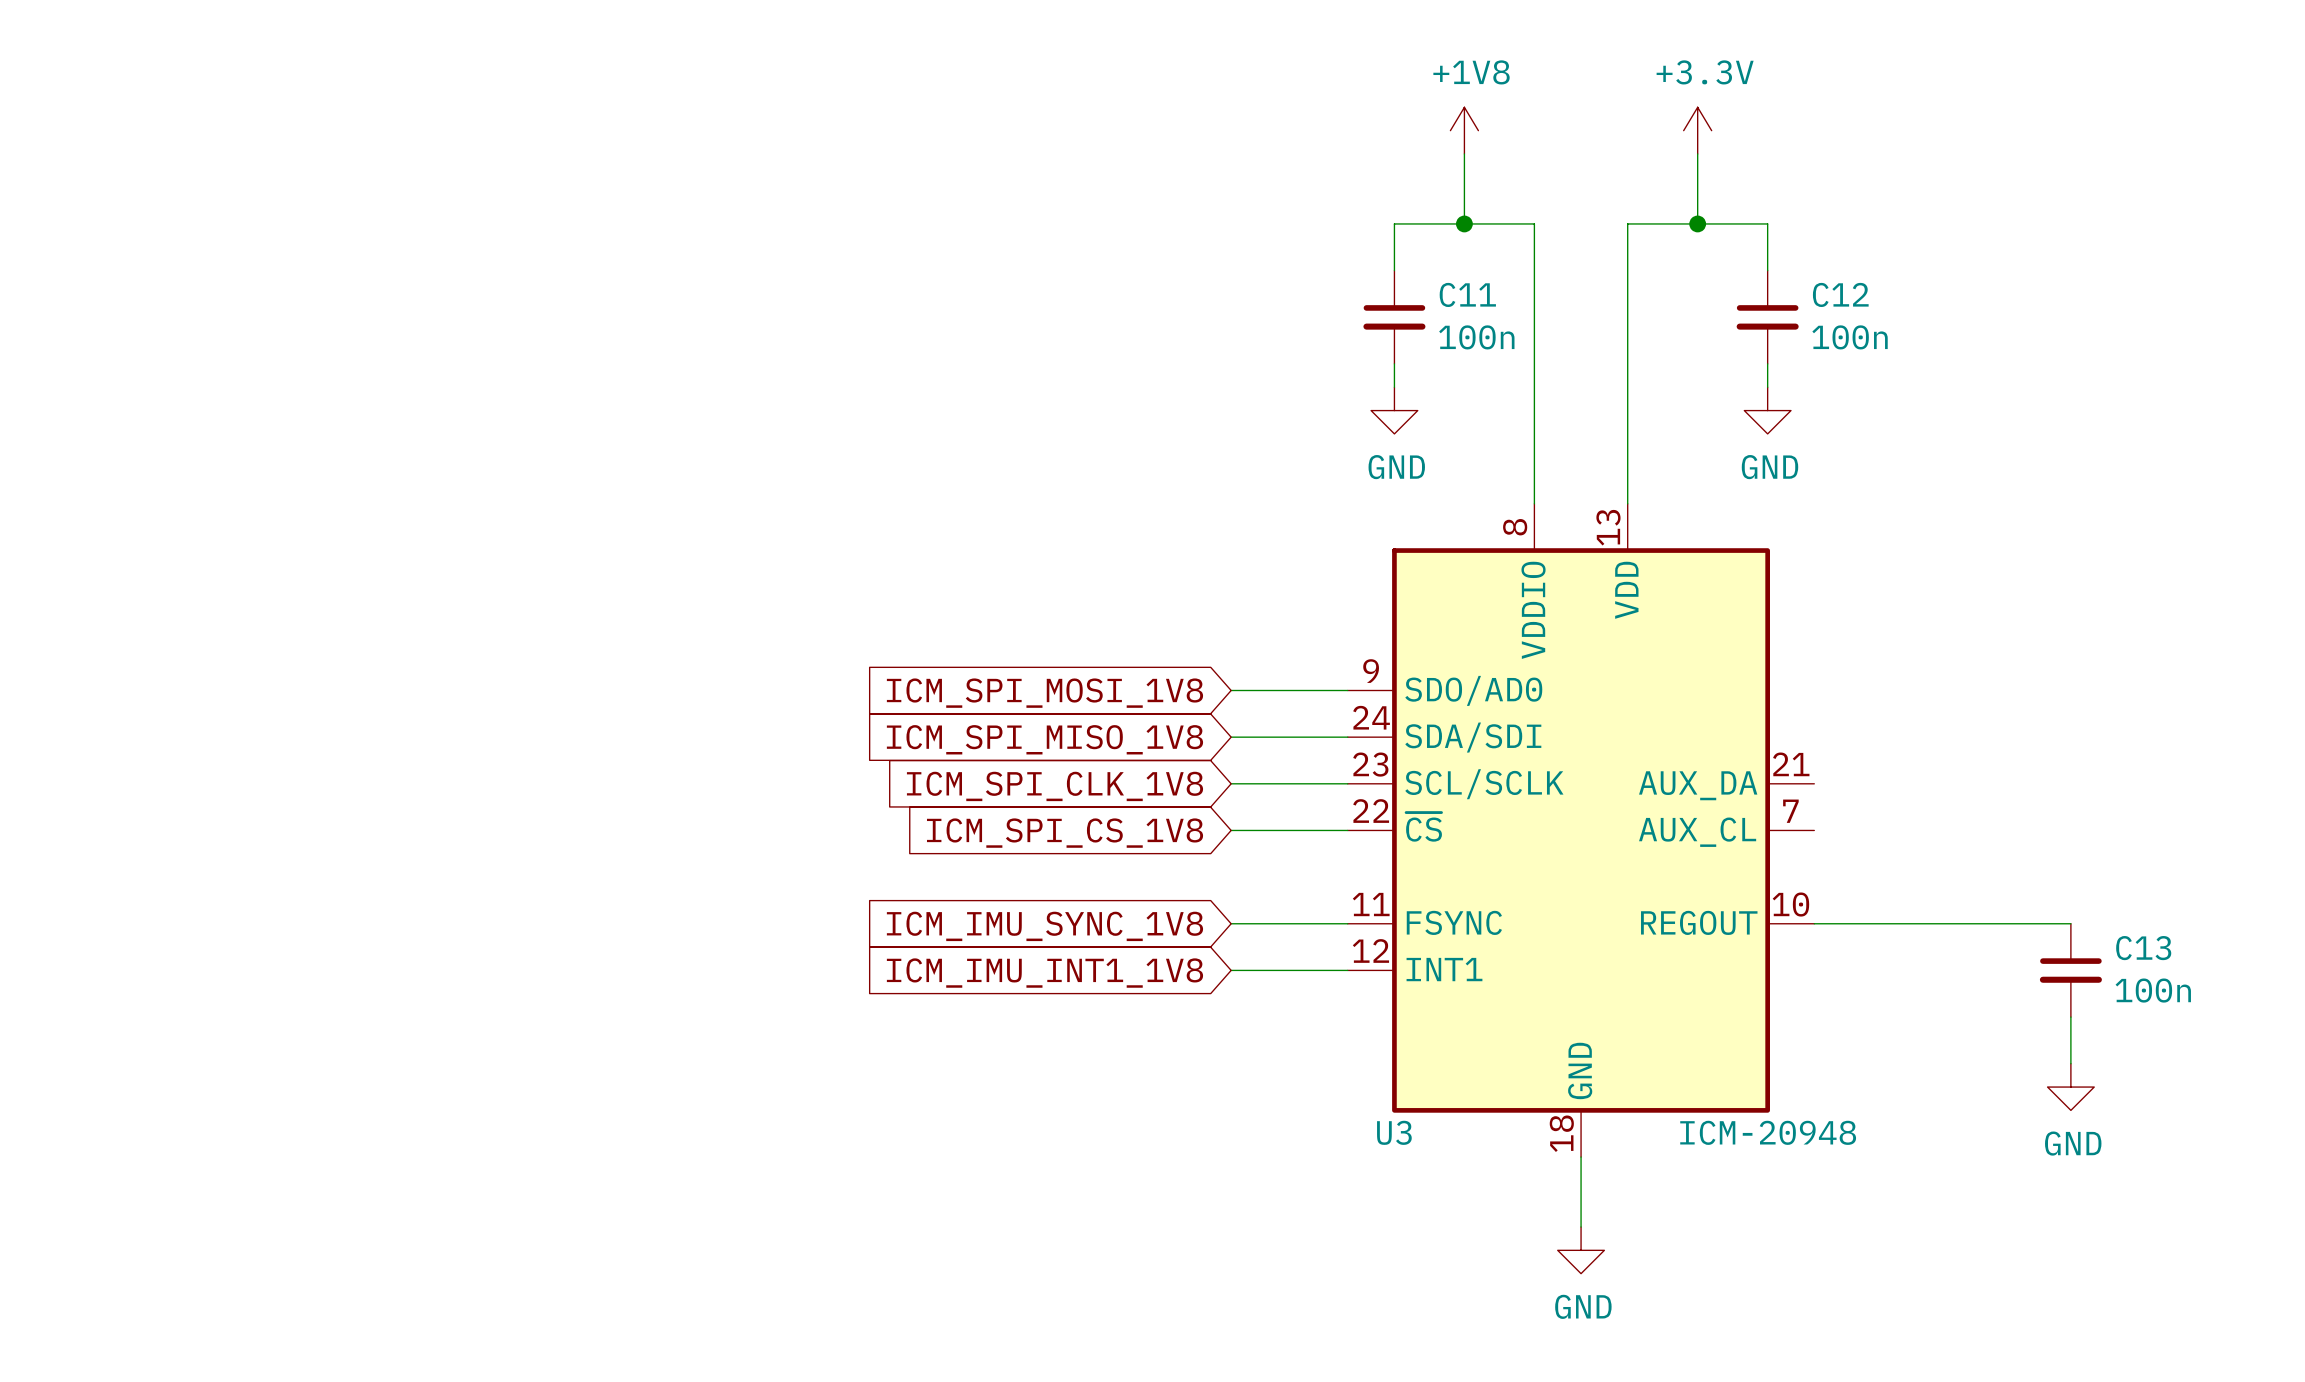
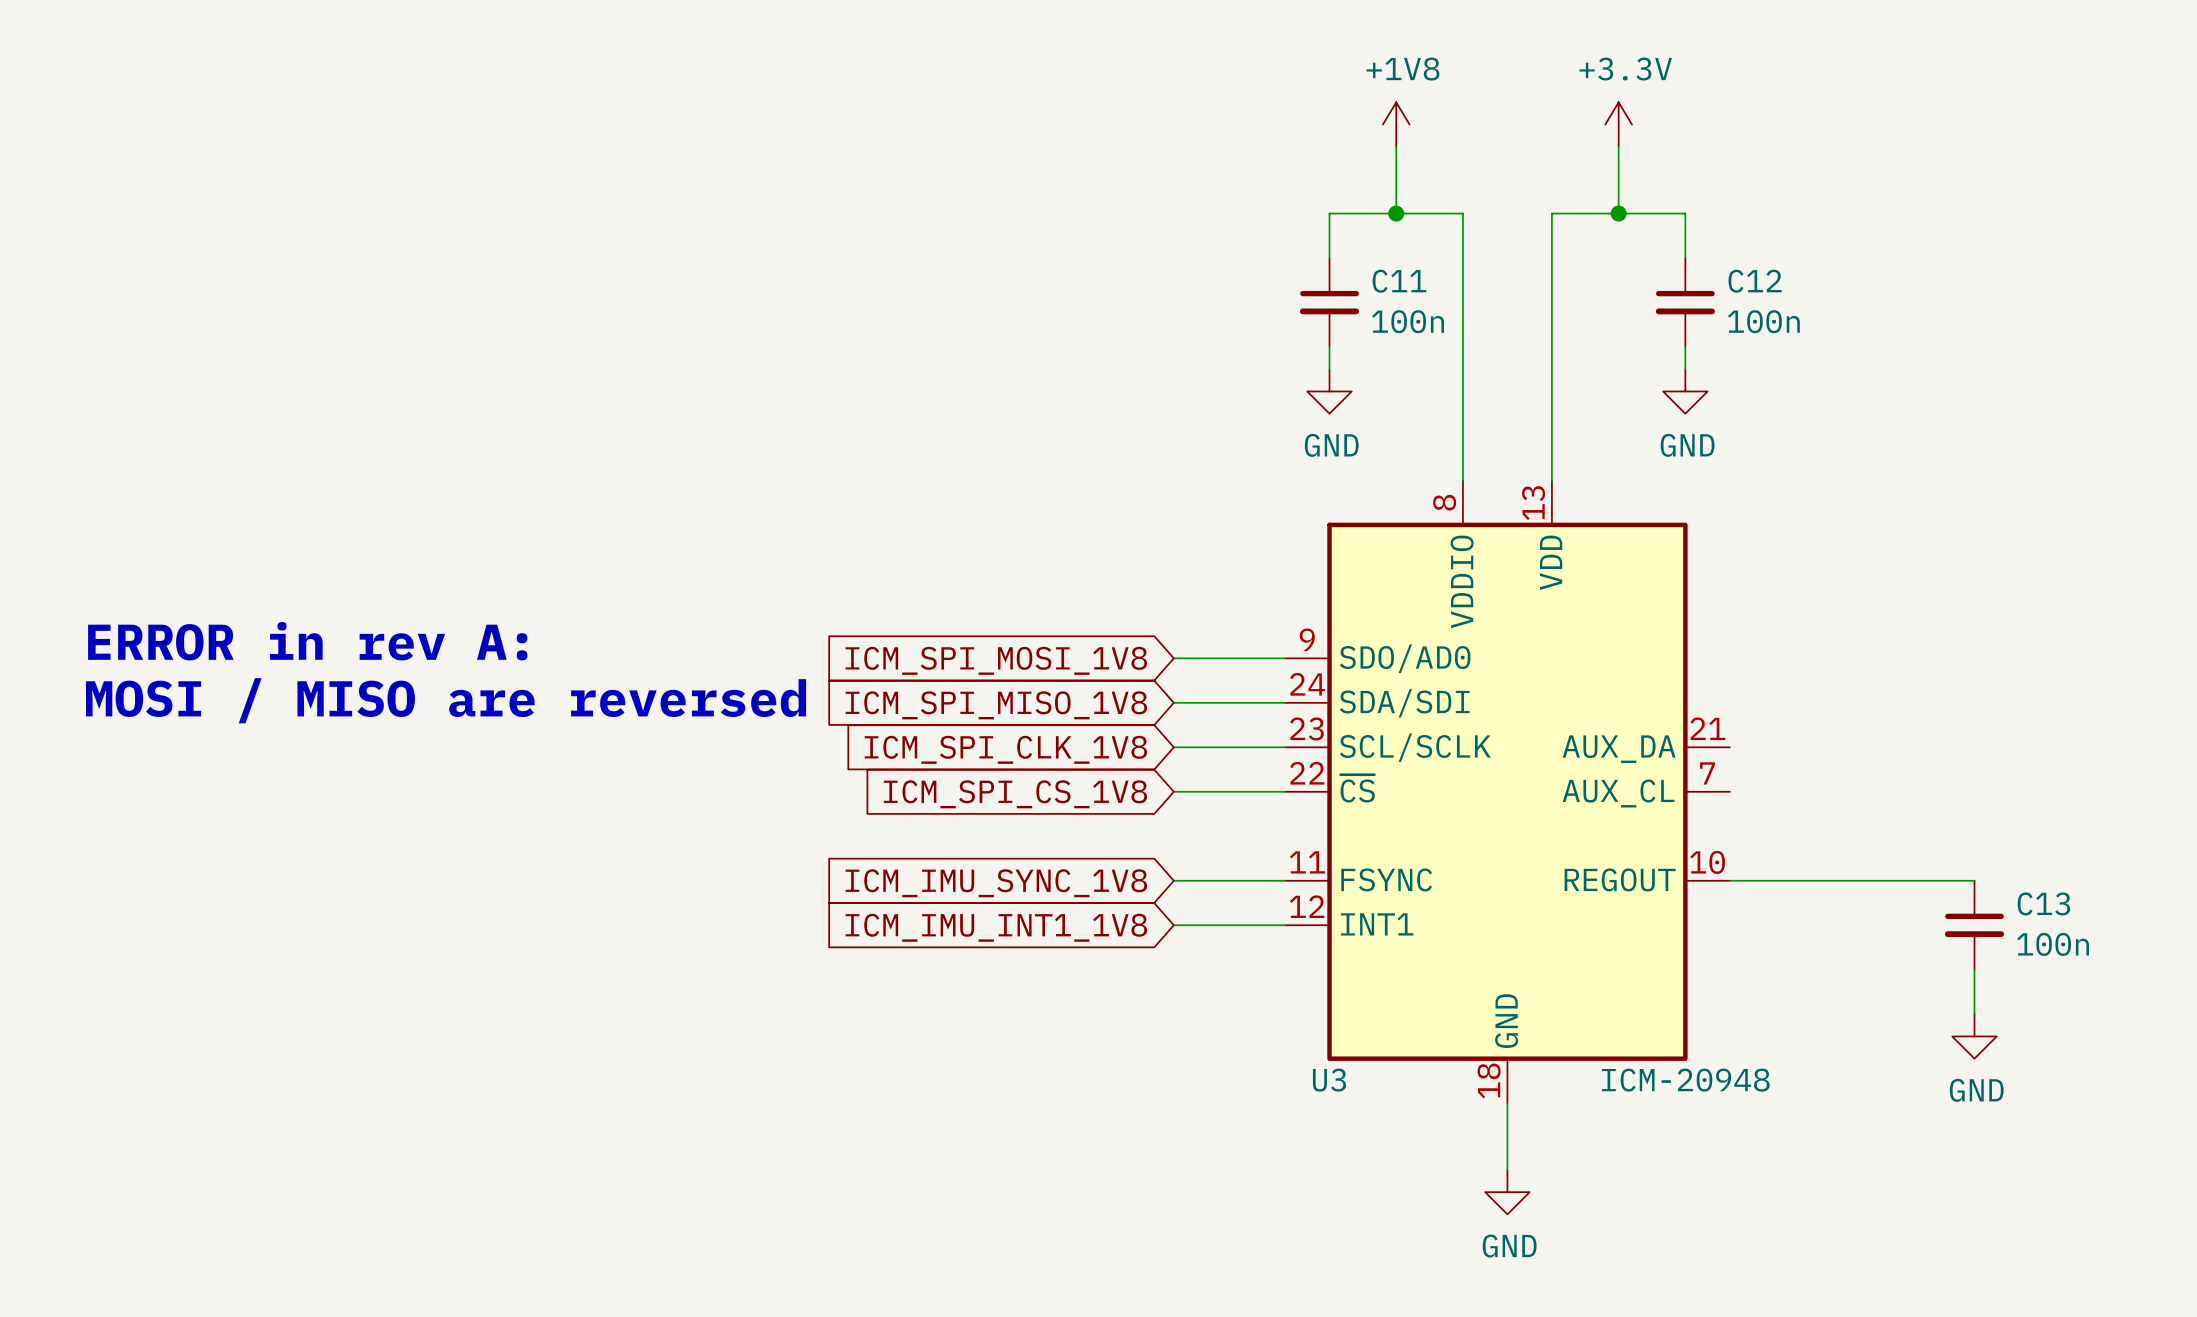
text: none -> ERROR in rev A: (307, 641)
text: none -> MOSI / MISO are reversed (446, 700)

